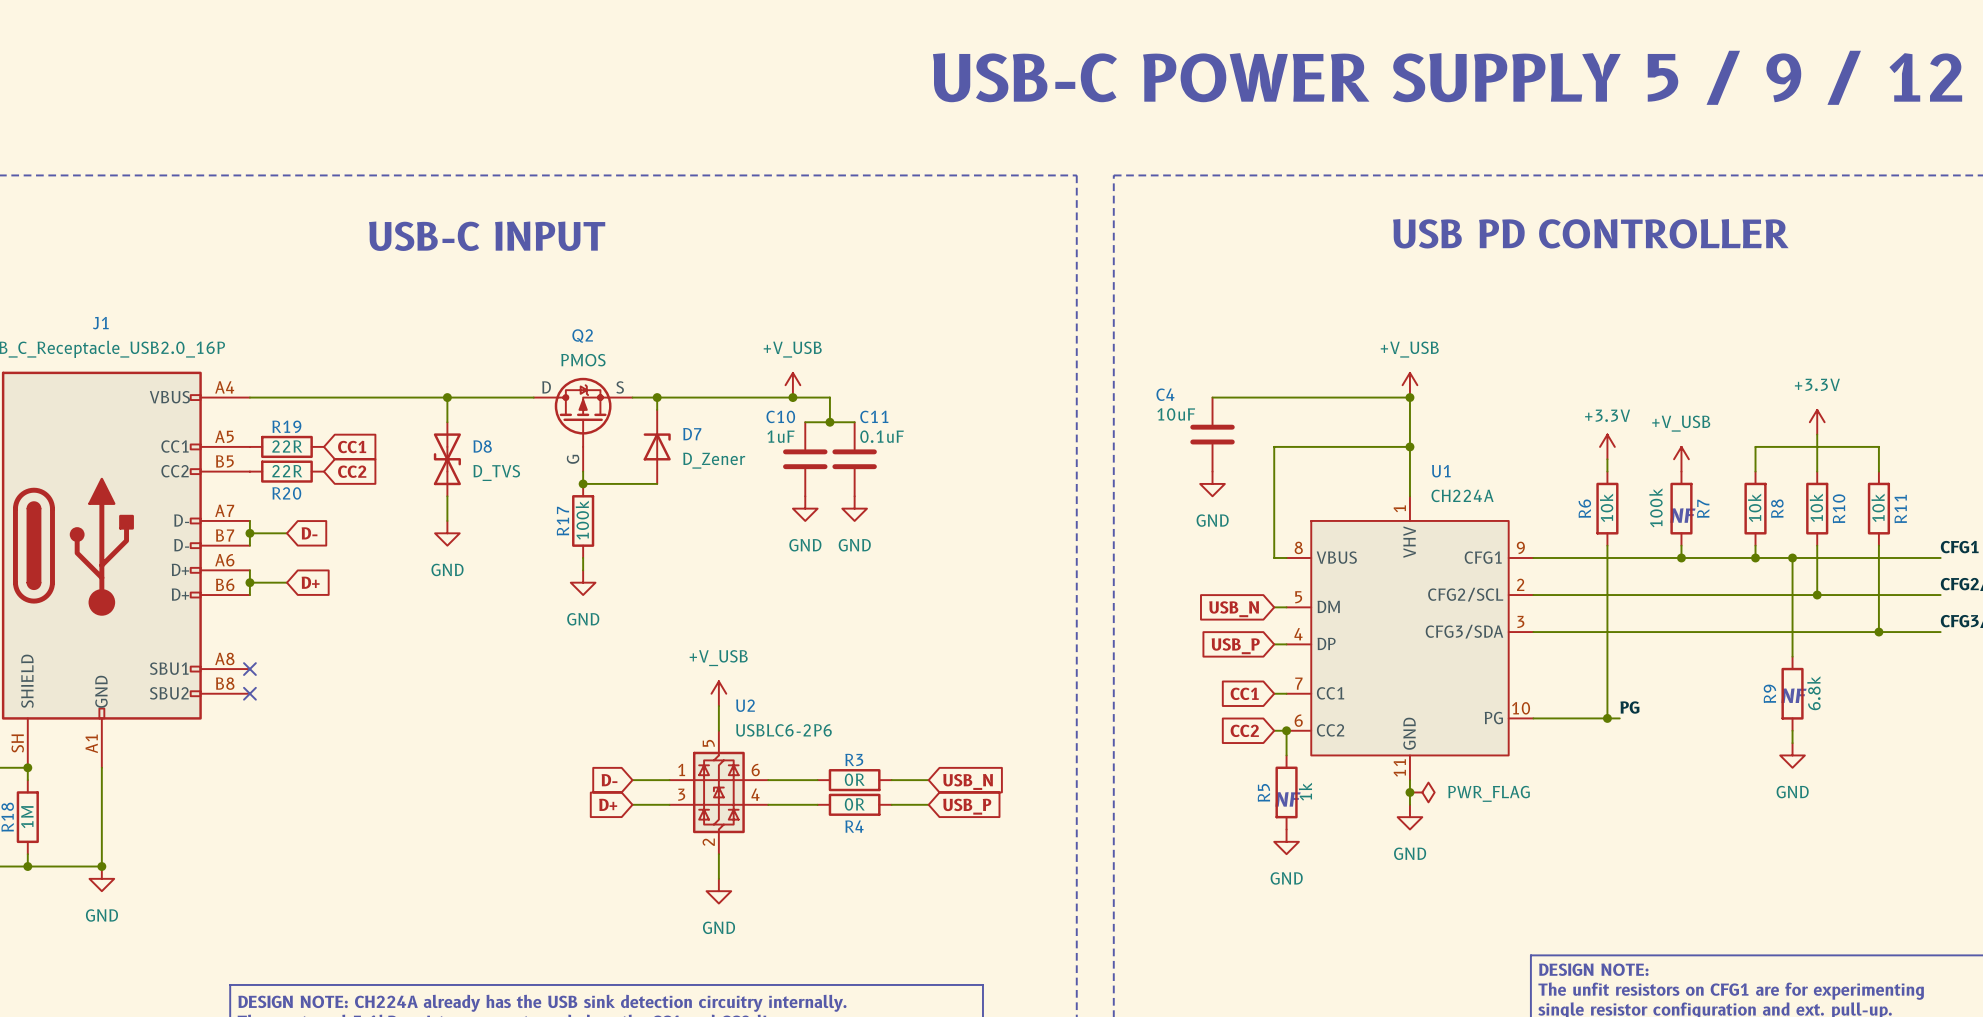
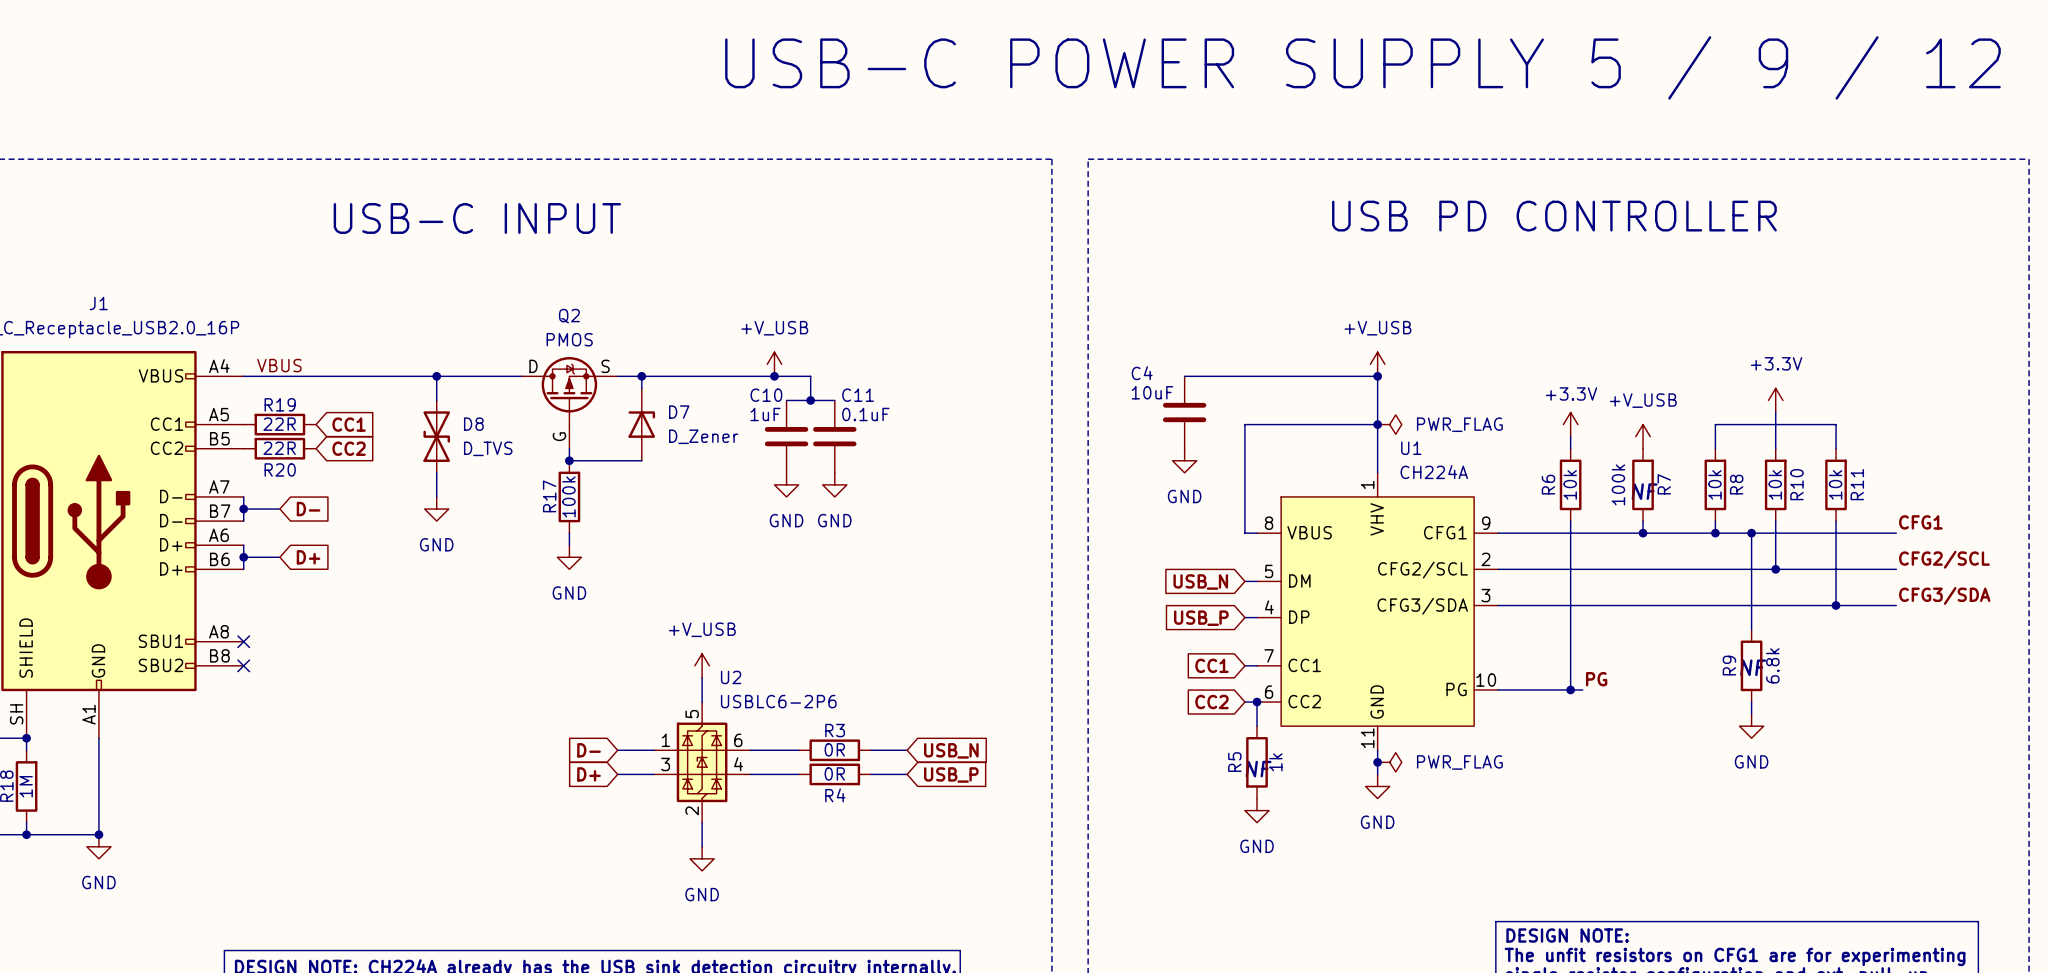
label: none -> VBUS (279, 365)
power symbol: none -> PWR_FLAG (1389, 424)

